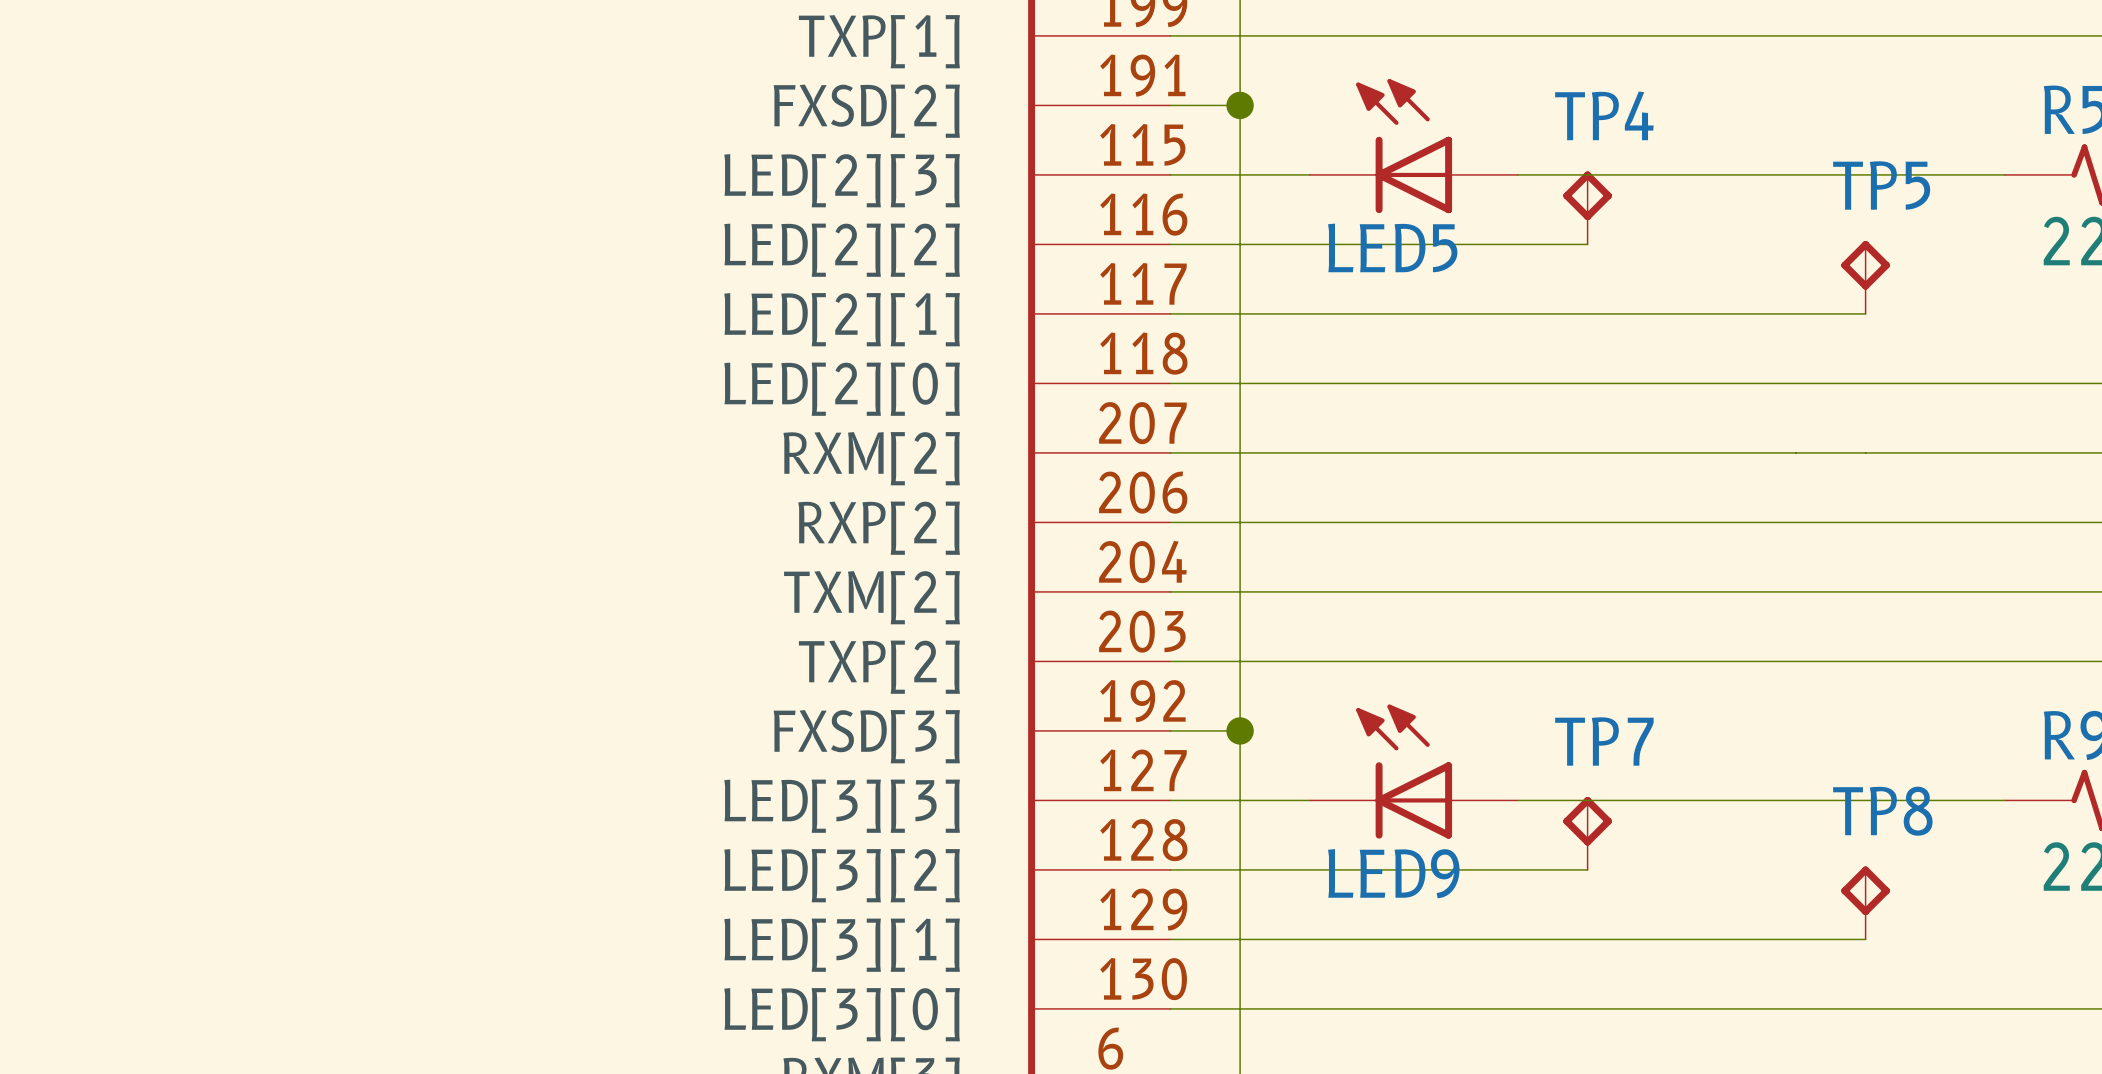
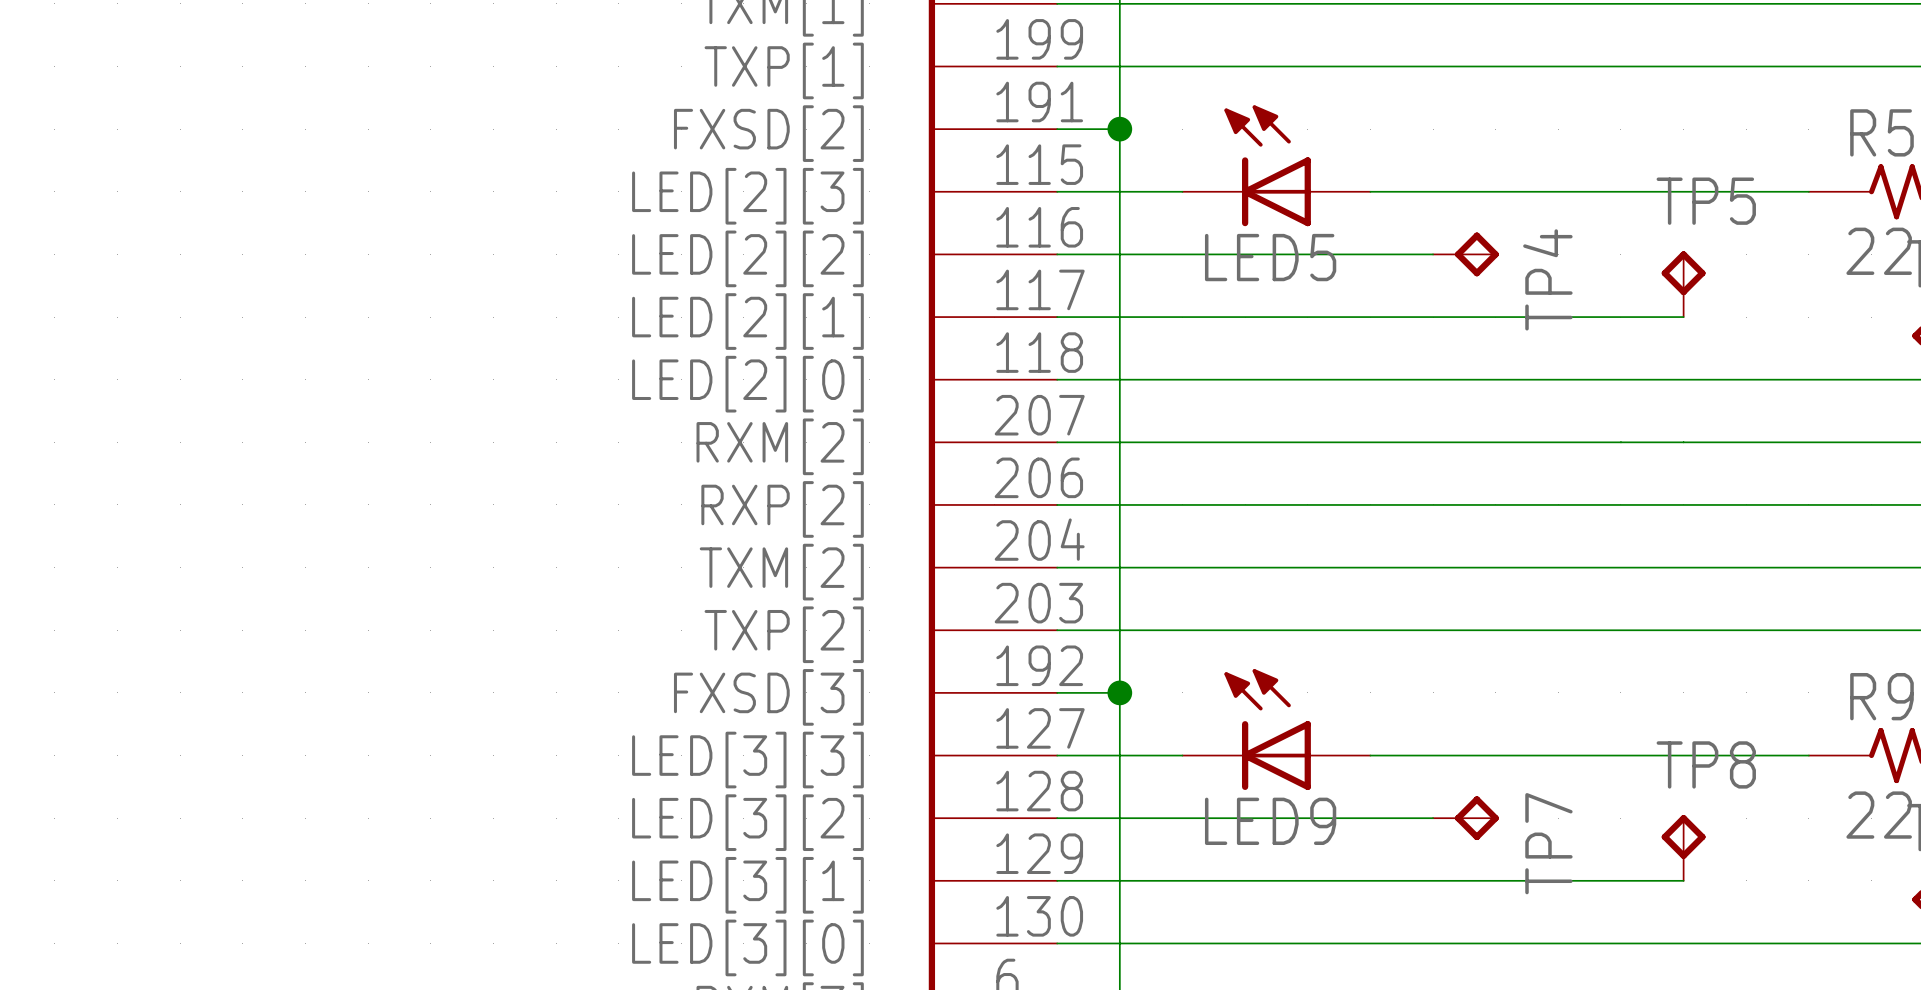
TP4 rotation: 0° (1587, 195) -> 90° clockwise (1476, 254)
TP4 position: (1587, 207) -> (1465, 254)
TP7 rotation: 0° (1587, 821) -> 90° clockwise (1476, 818)
TP7 position: (1587, 833) -> (1465, 818)

